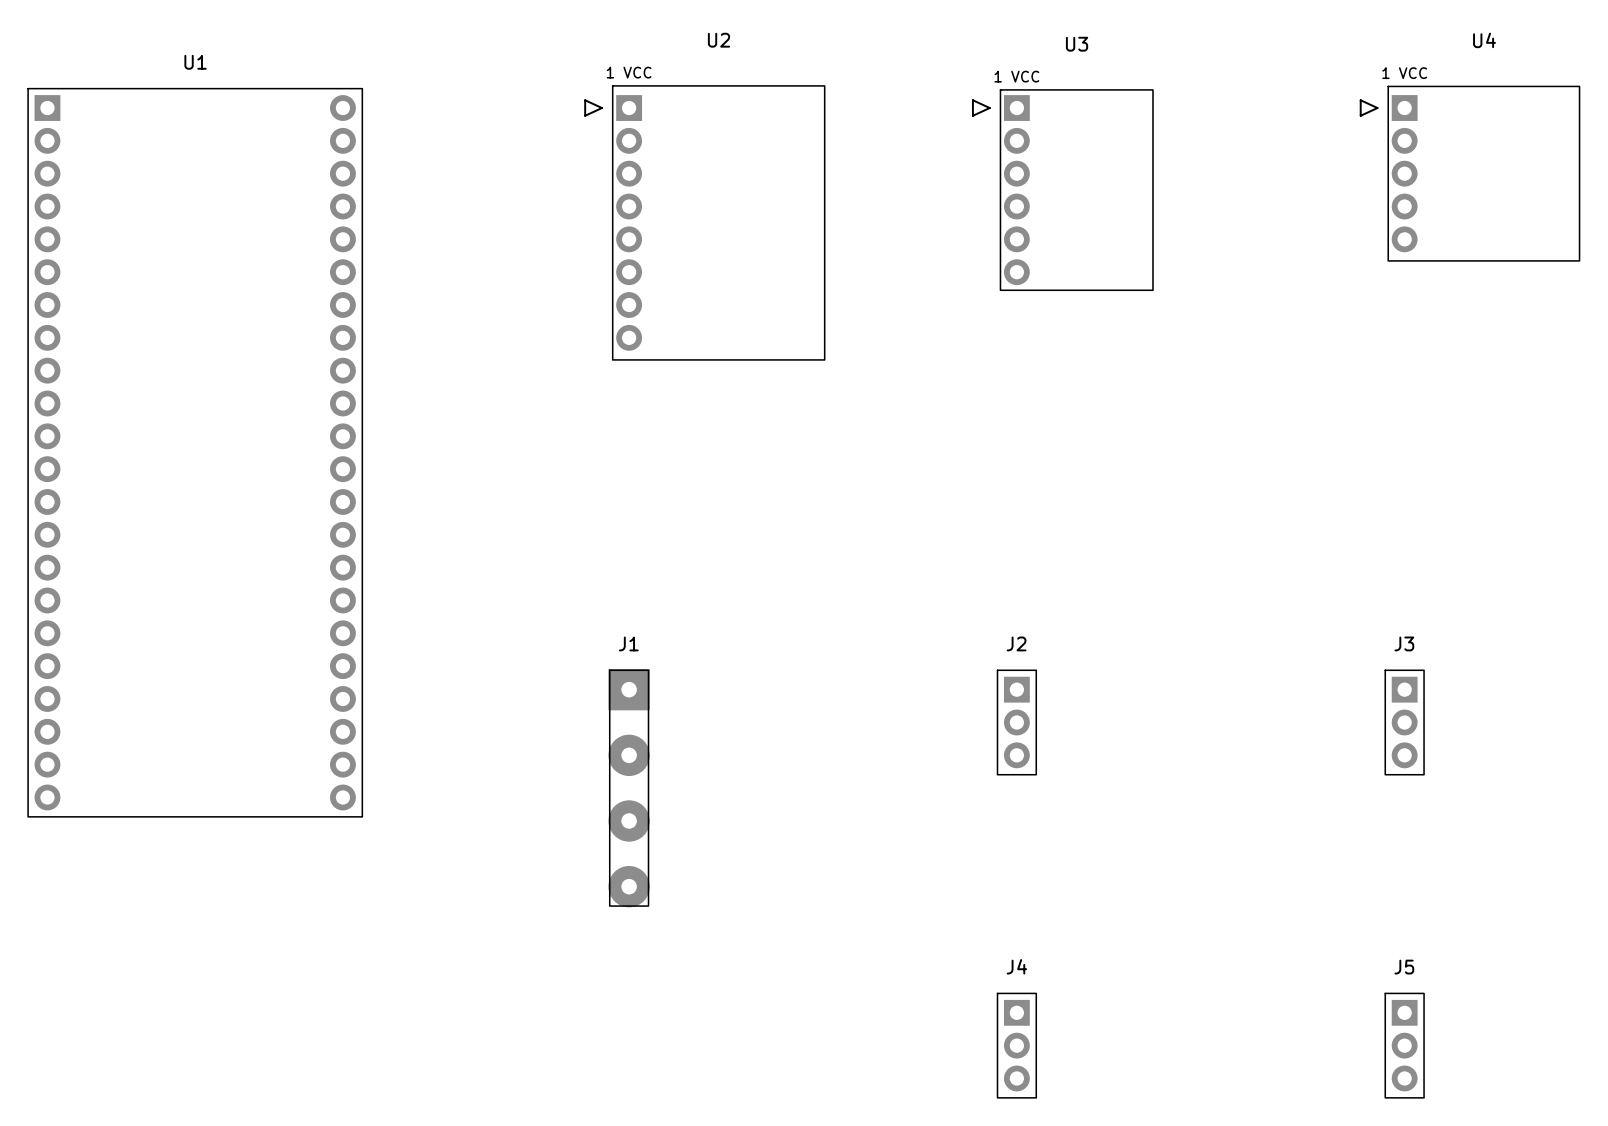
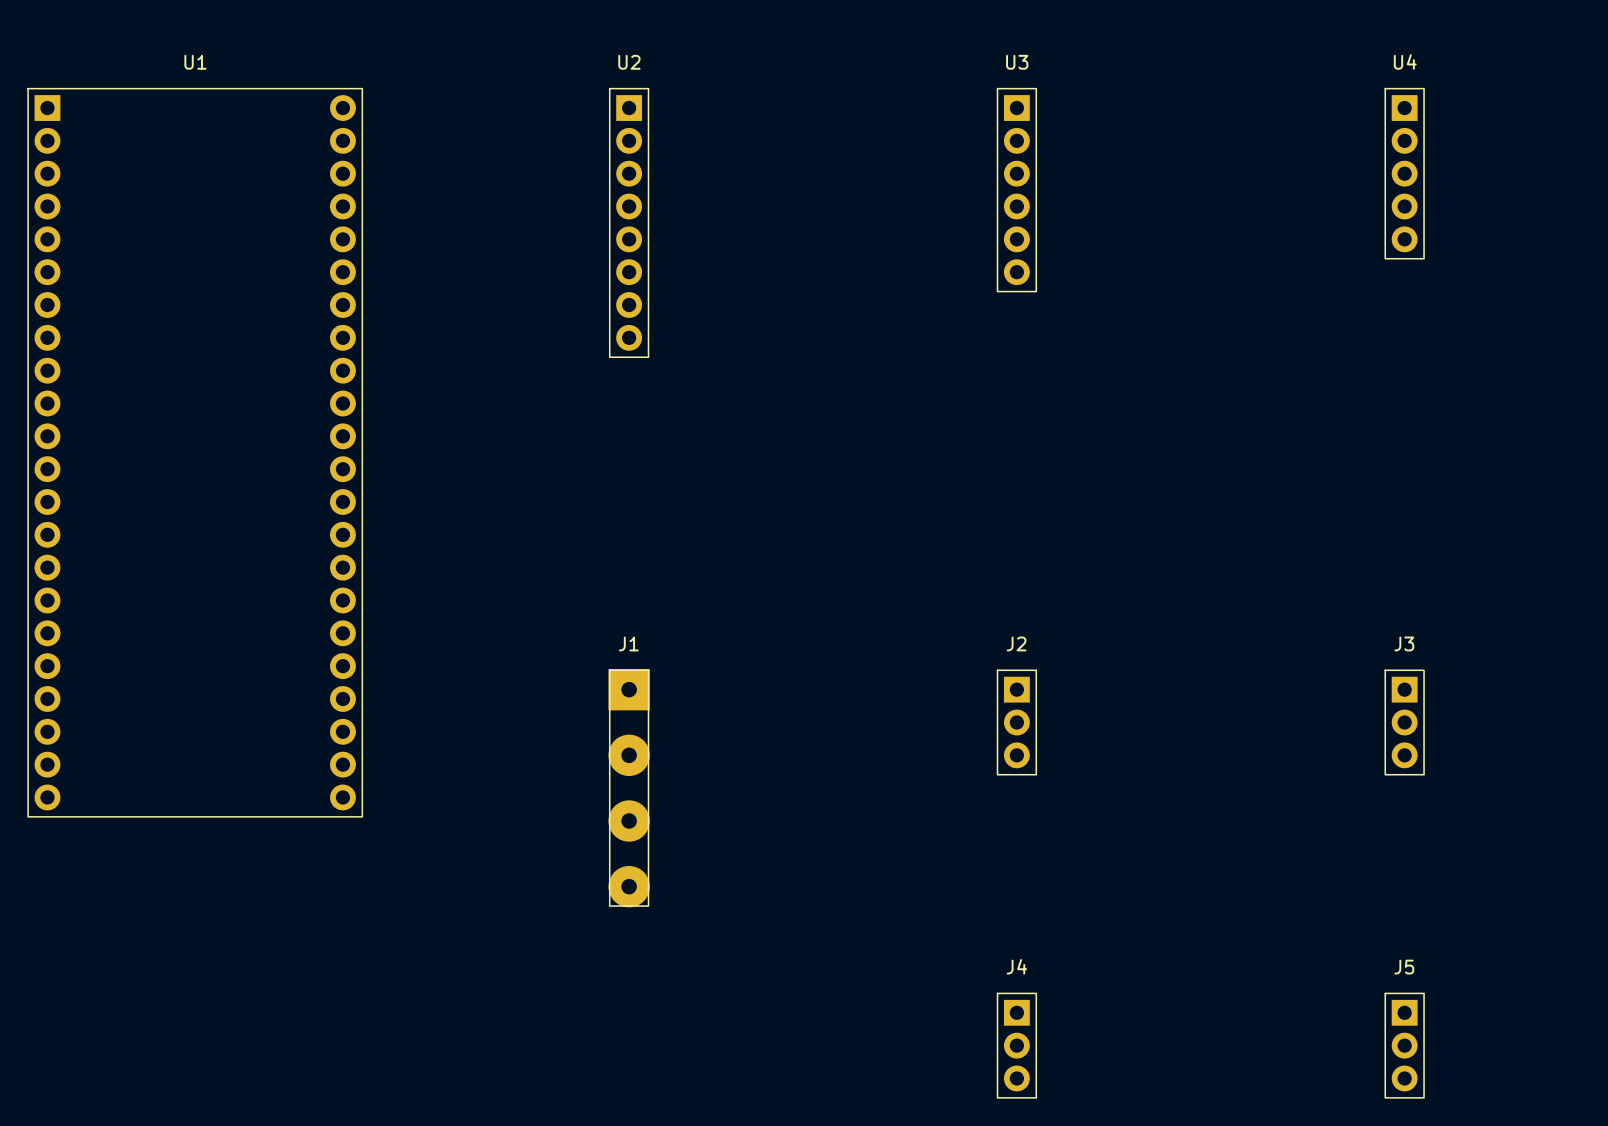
U2 name position: U2 (719, 40) -> U2 (629, 62)
U2 footprint: [584, 85, 826, 361] -> [608, 87, 650, 359]
U4 footprint: [1359, 85, 1581, 262] -> [1384, 87, 1425, 260]
U3 footprint: [971, 89, 1154, 292] -> [996, 87, 1038, 293]

